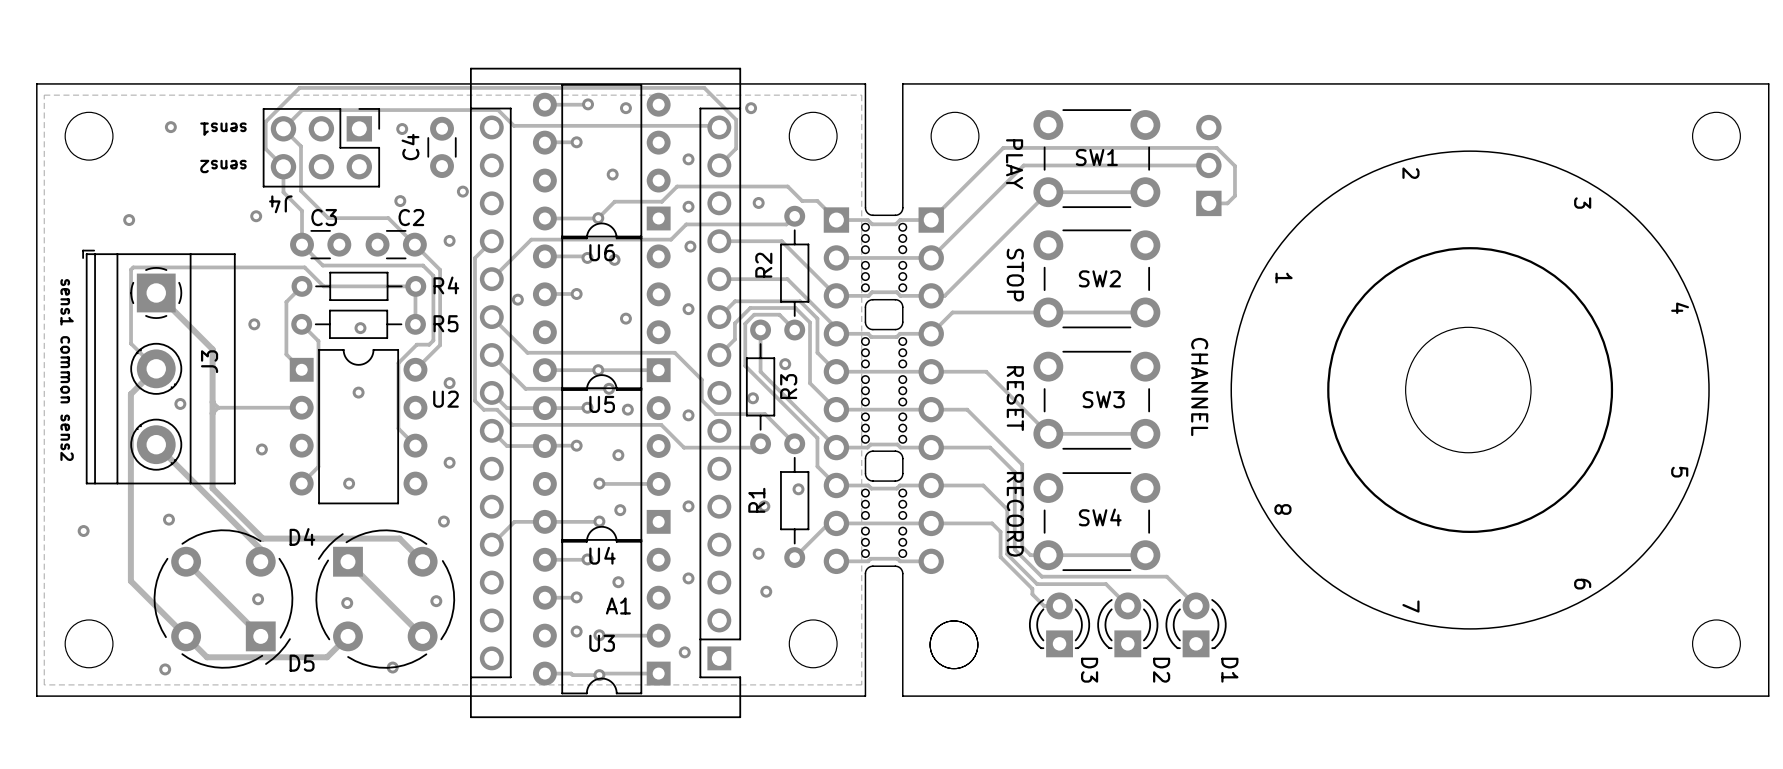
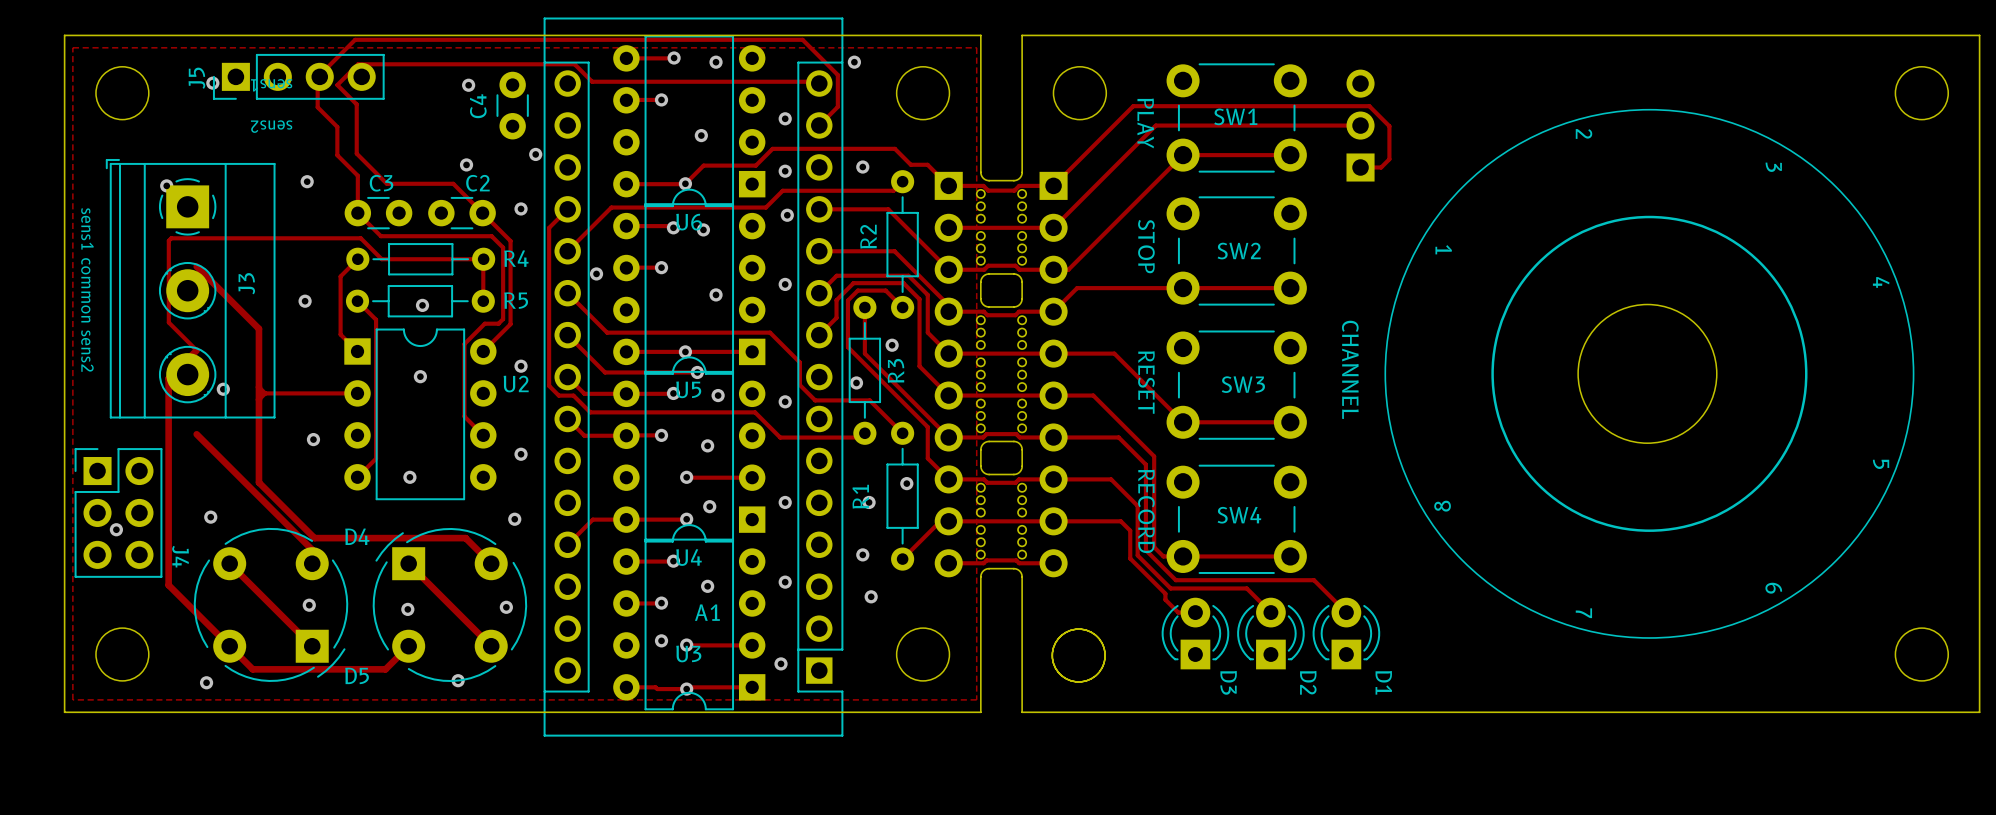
J5: none -> (298, 76)
J4 rotation: 0° (321, 147) -> 90° counterclockwise (118, 512)
J4 position: (321, 147) -> (118, 512)
J3 position: (158, 367) -> (190, 288)
text position: sens1 common sens2 (67, 370) -> sens1 common sens2 (87, 289)

